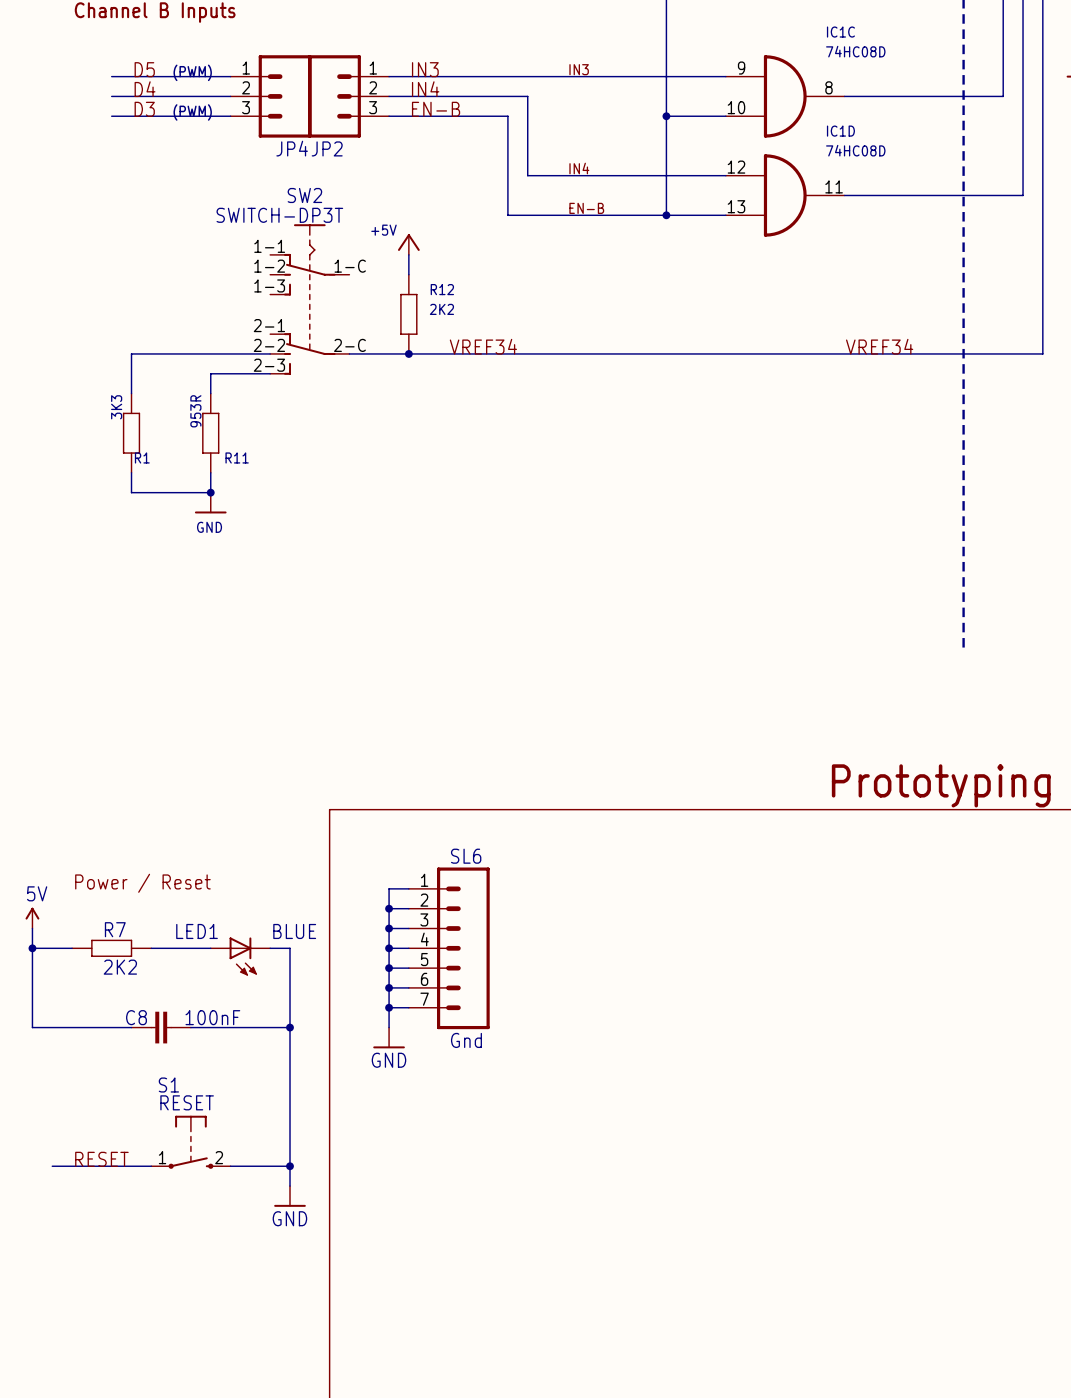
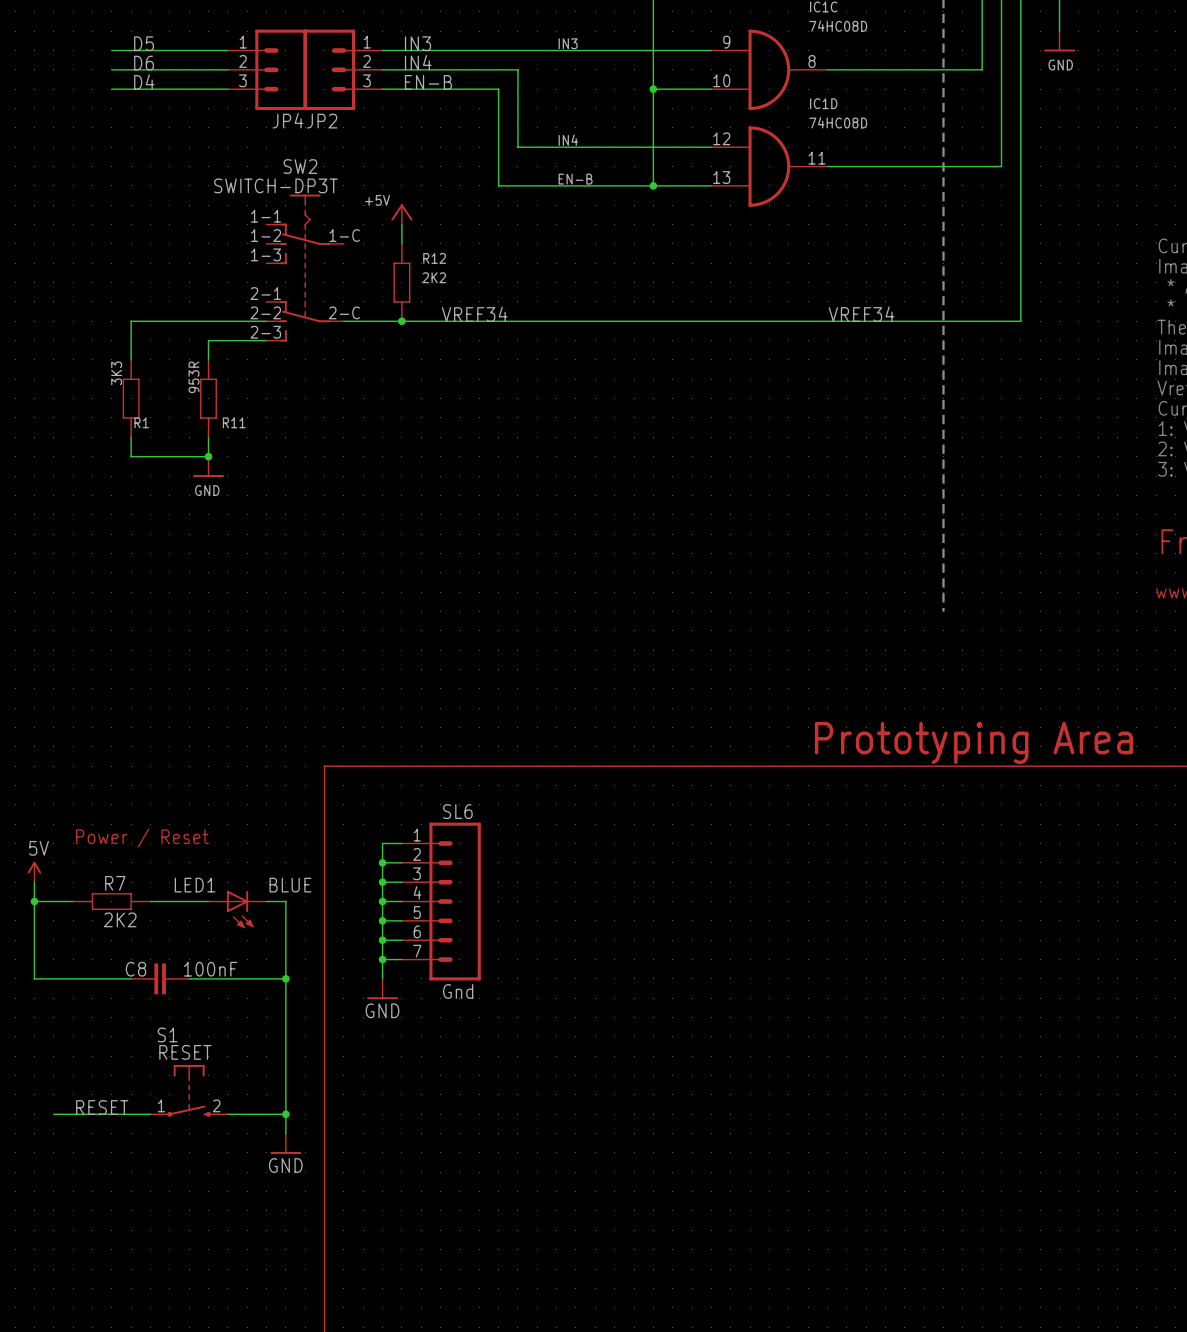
text: (PWM) (192, 72) -> none
label: D4 (145, 89) -> D6 (144, 63)
label: D3 (144, 109) -> D4 (144, 82)
text: (PWM) (192, 112) -> none

